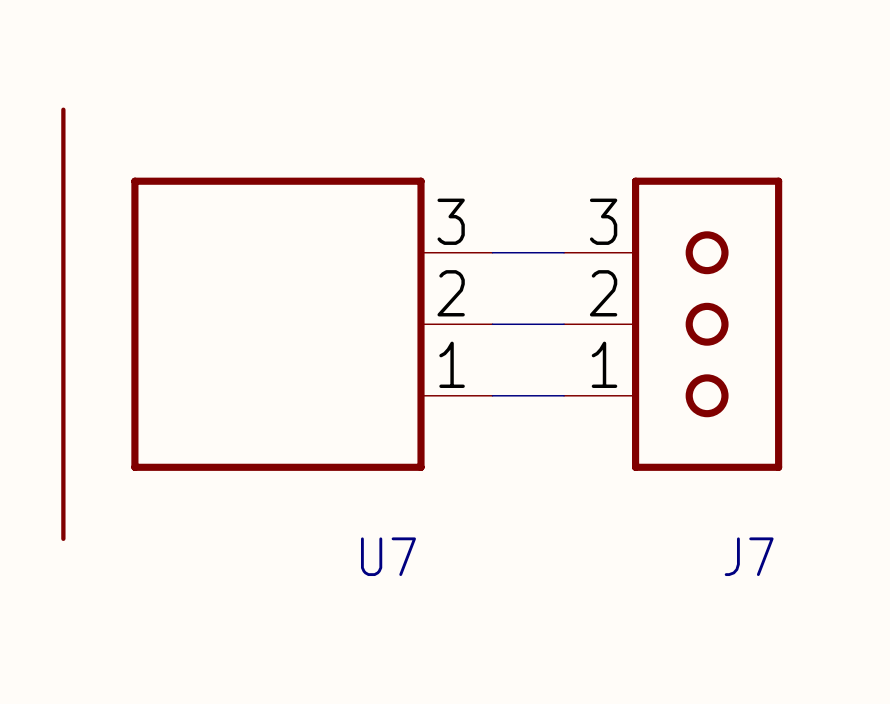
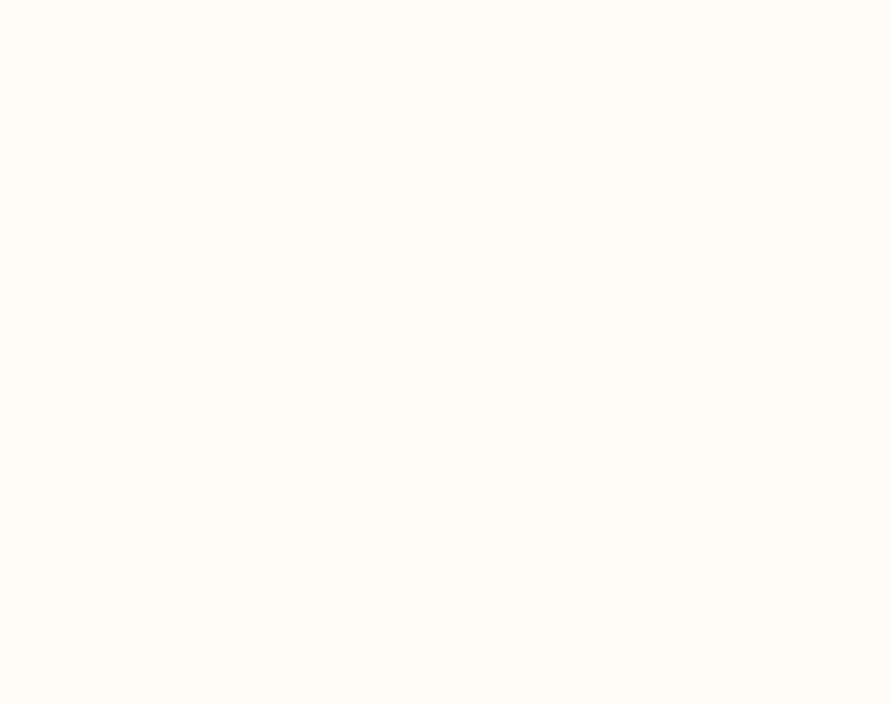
line: (63, 109) (63, 538) -> none
wire: (492, 252) (564, 252) -> none
U7: (311, 324) -> none
wire: (492, 324) (564, 324) -> none
J7: (673, 324) -> none
wire: (492, 395) (564, 395) -> none

